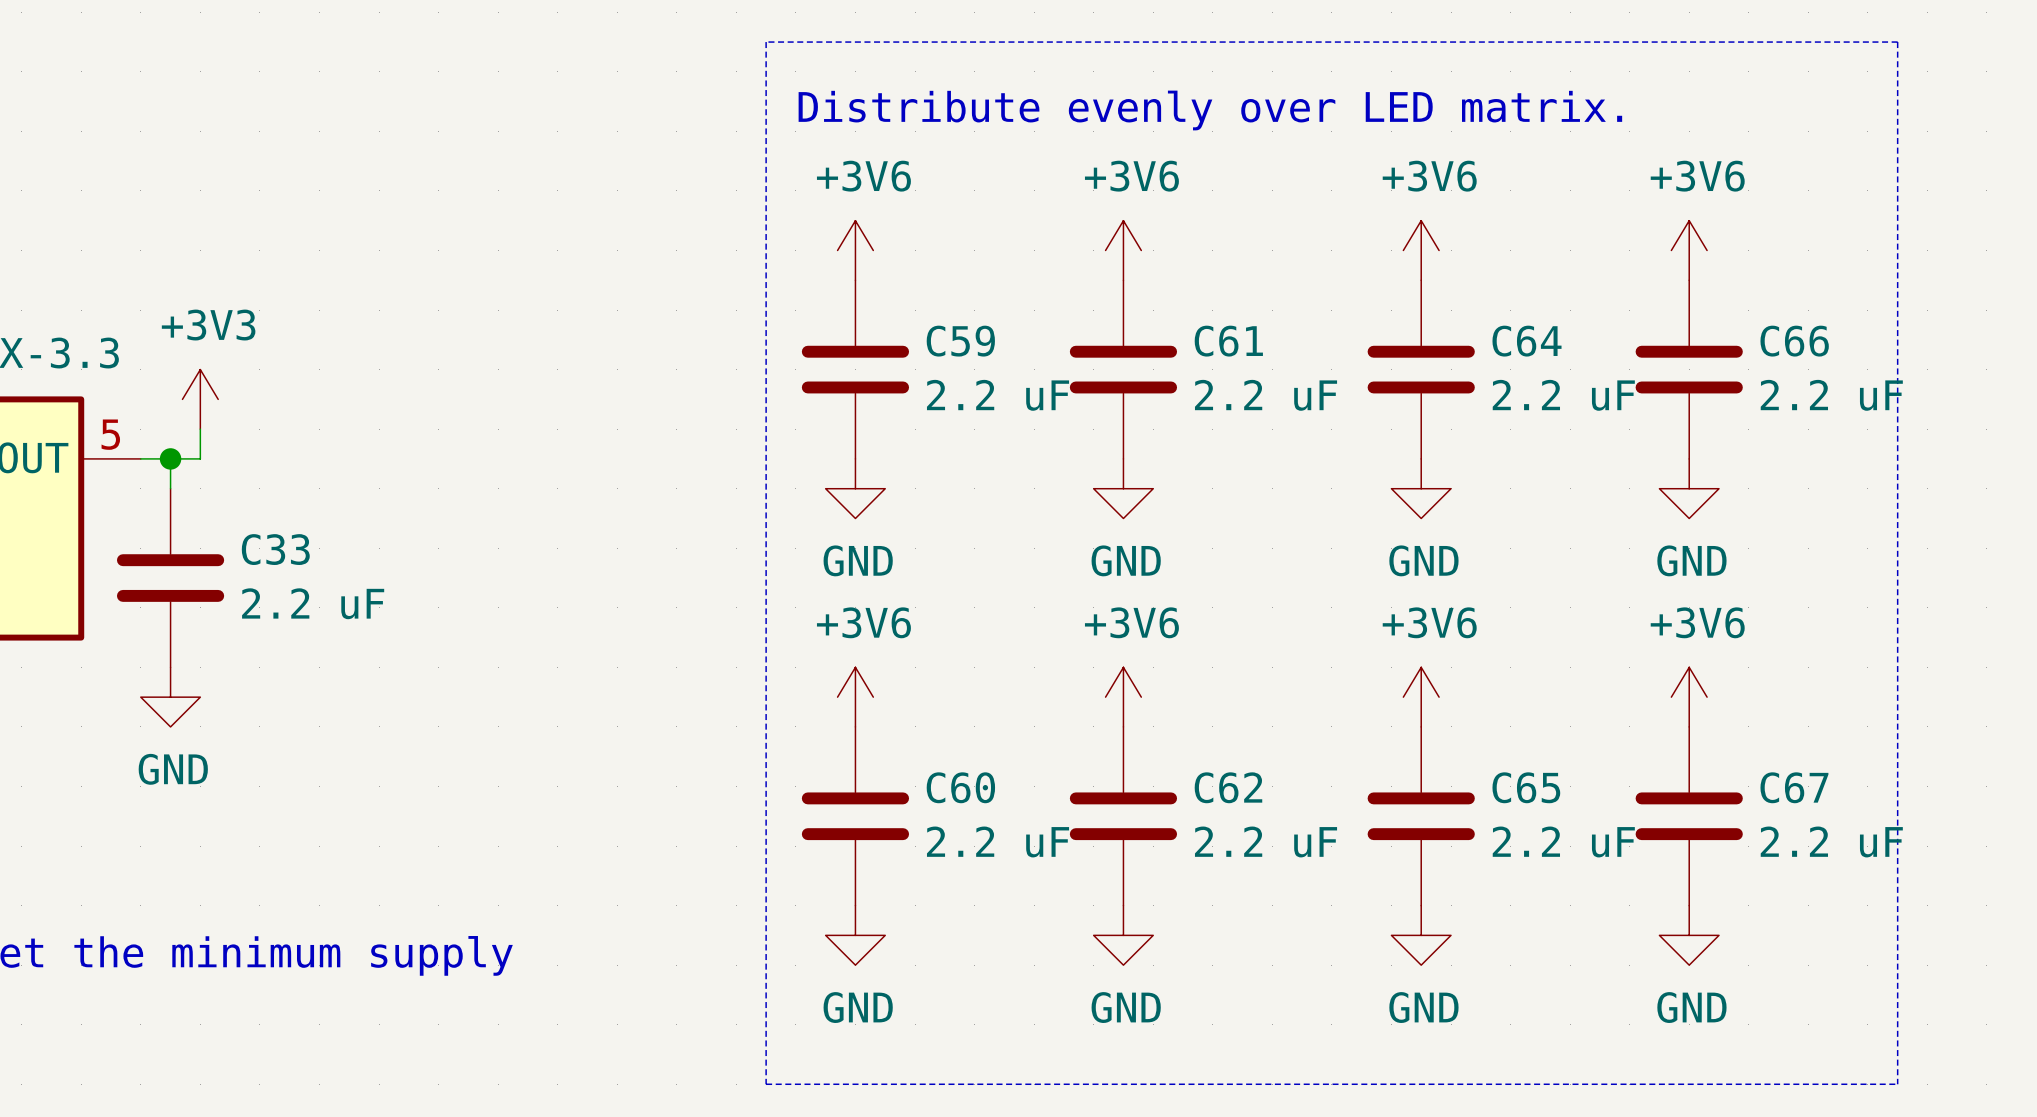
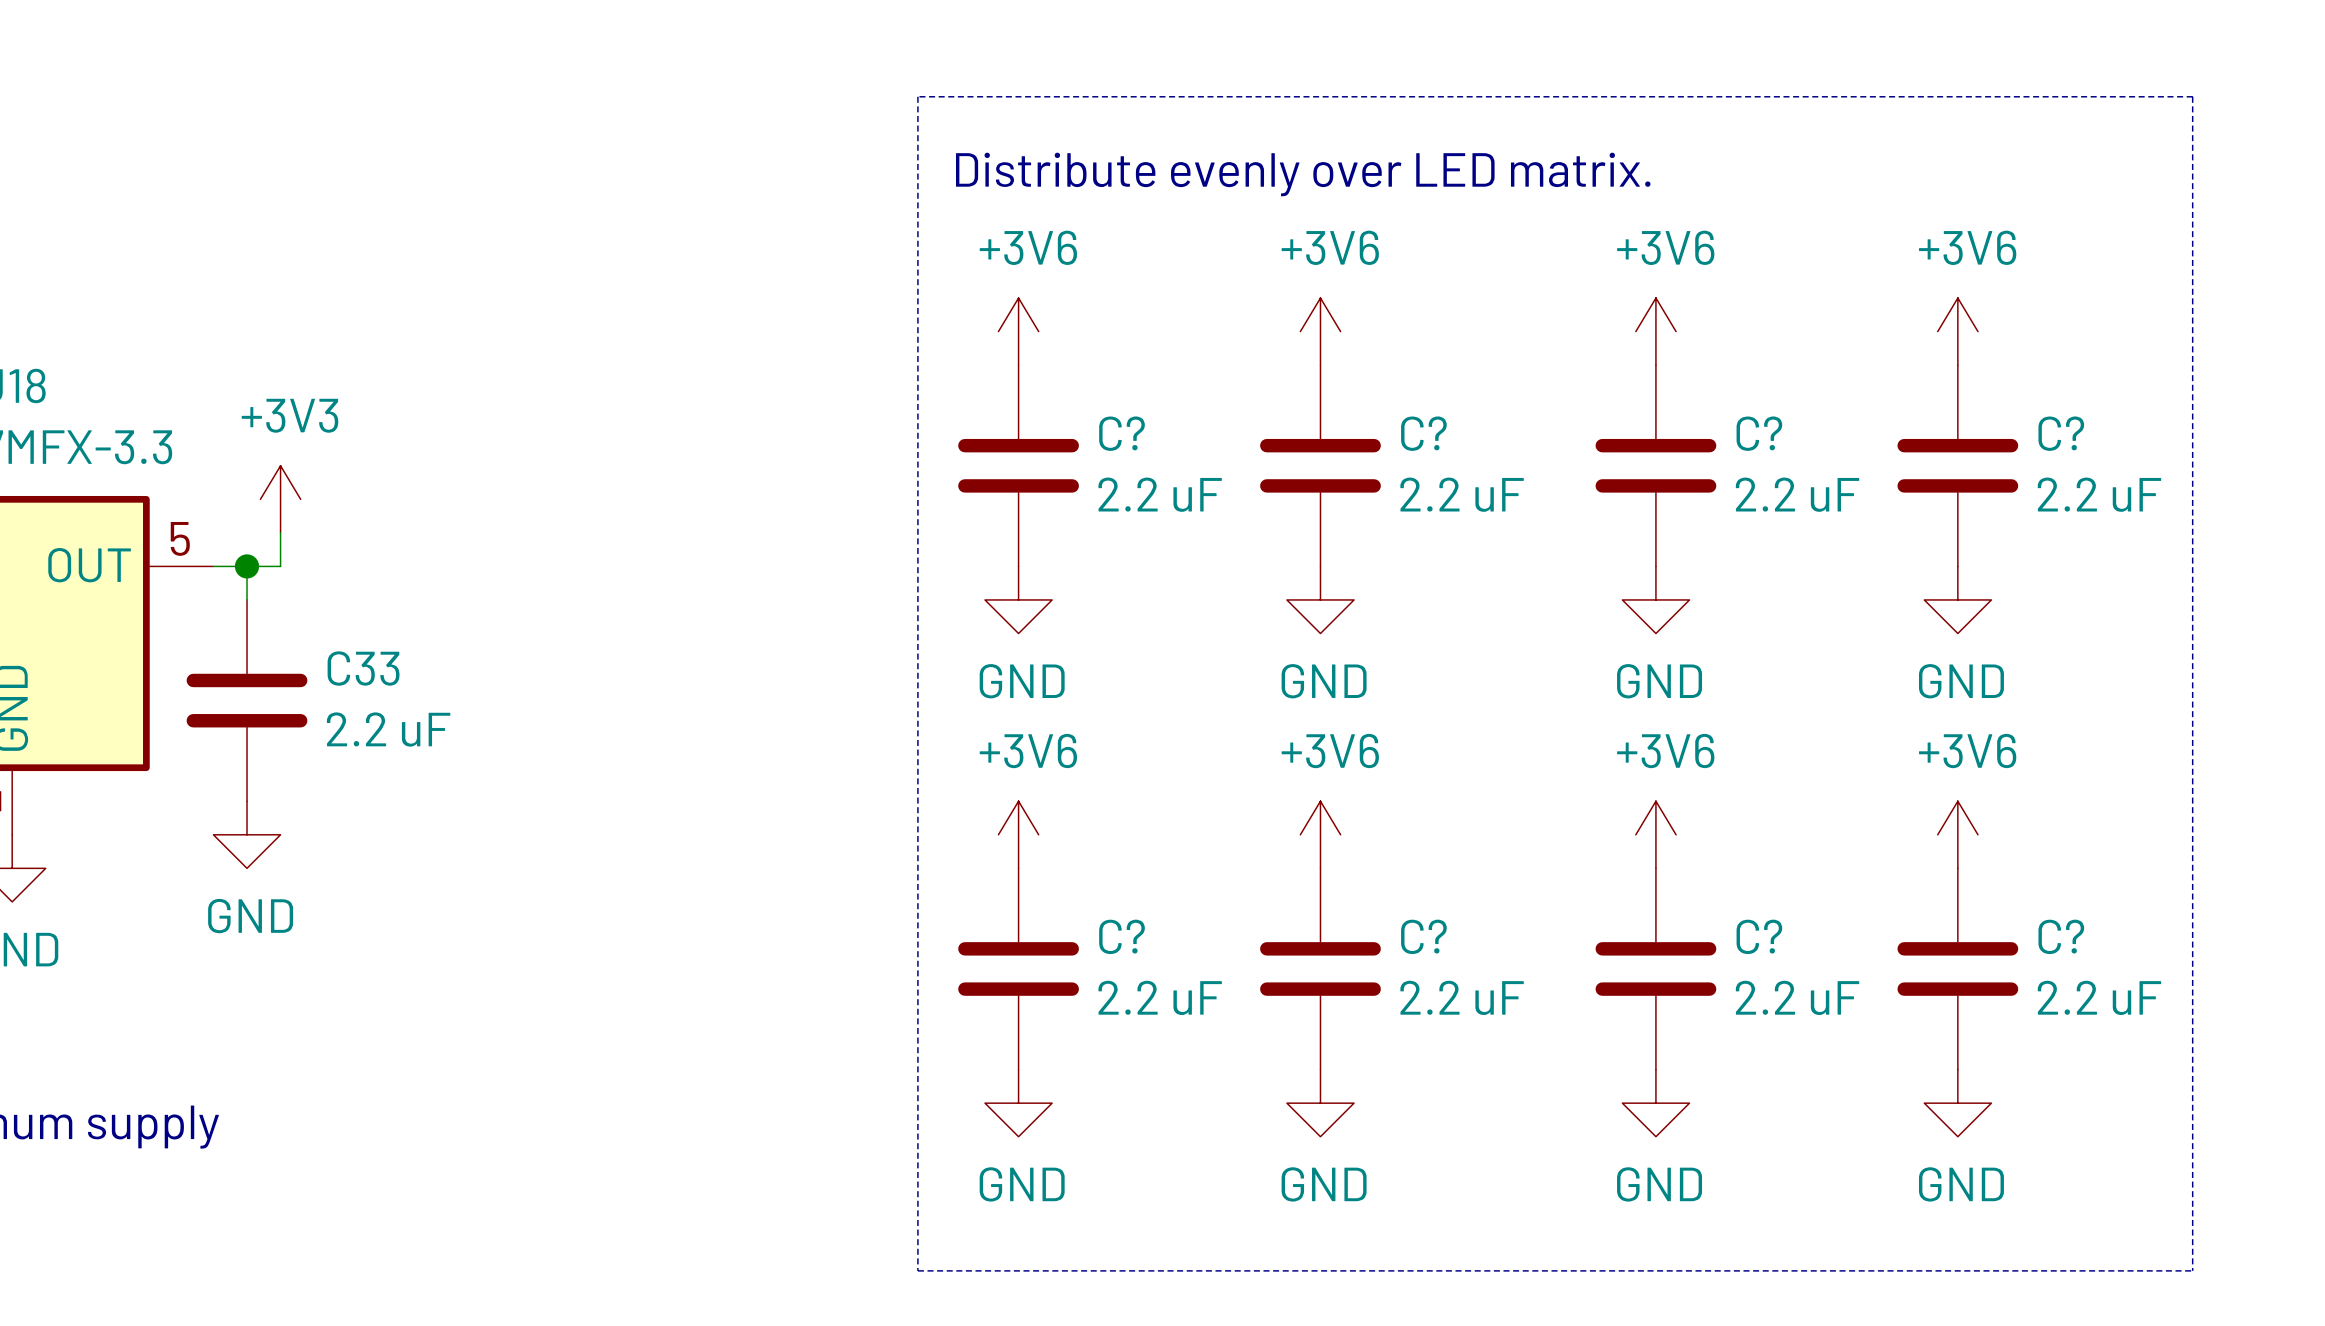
C59 name: C59 (960, 341) -> C? (1122, 433)
C61 name: C61 (1228, 341) -> C? (1423, 433)
C64 name: C64 (1527, 341) -> C? (1759, 433)
C66 name: C66 (1794, 341) -> C? (2061, 433)
C60 name: C60 (960, 787) -> C? (1122, 936)
C62 name: C62 (1228, 787) -> C? (1423, 936)
C65 name: C65 (1526, 787) -> C? (1759, 936)
C67 name: C67 (1794, 787) -> C? (2061, 936)

